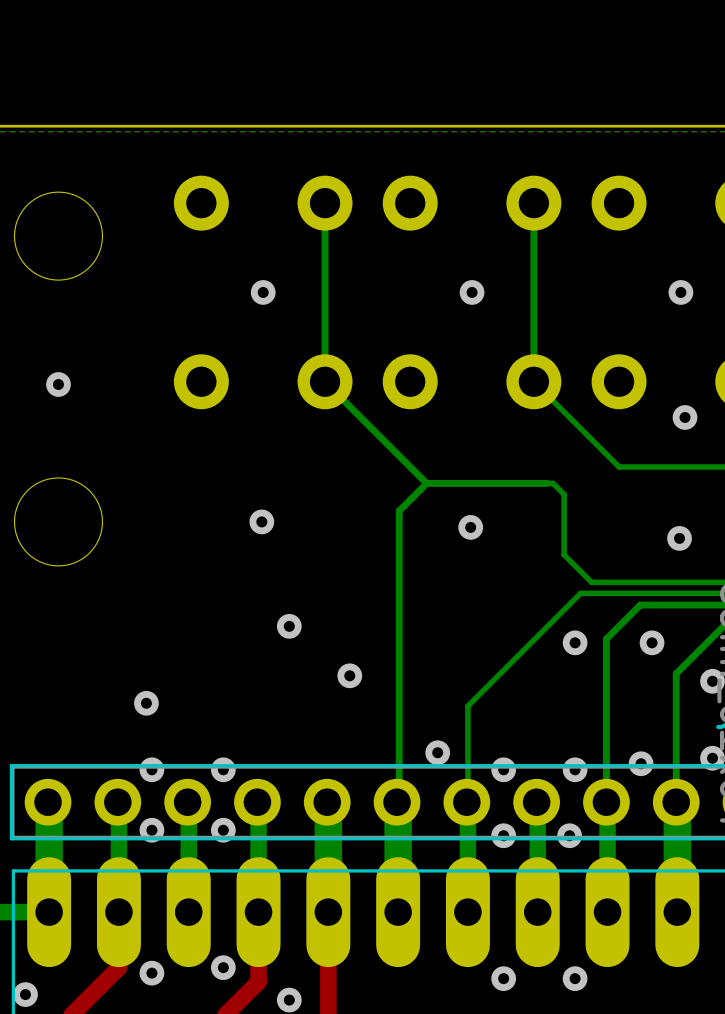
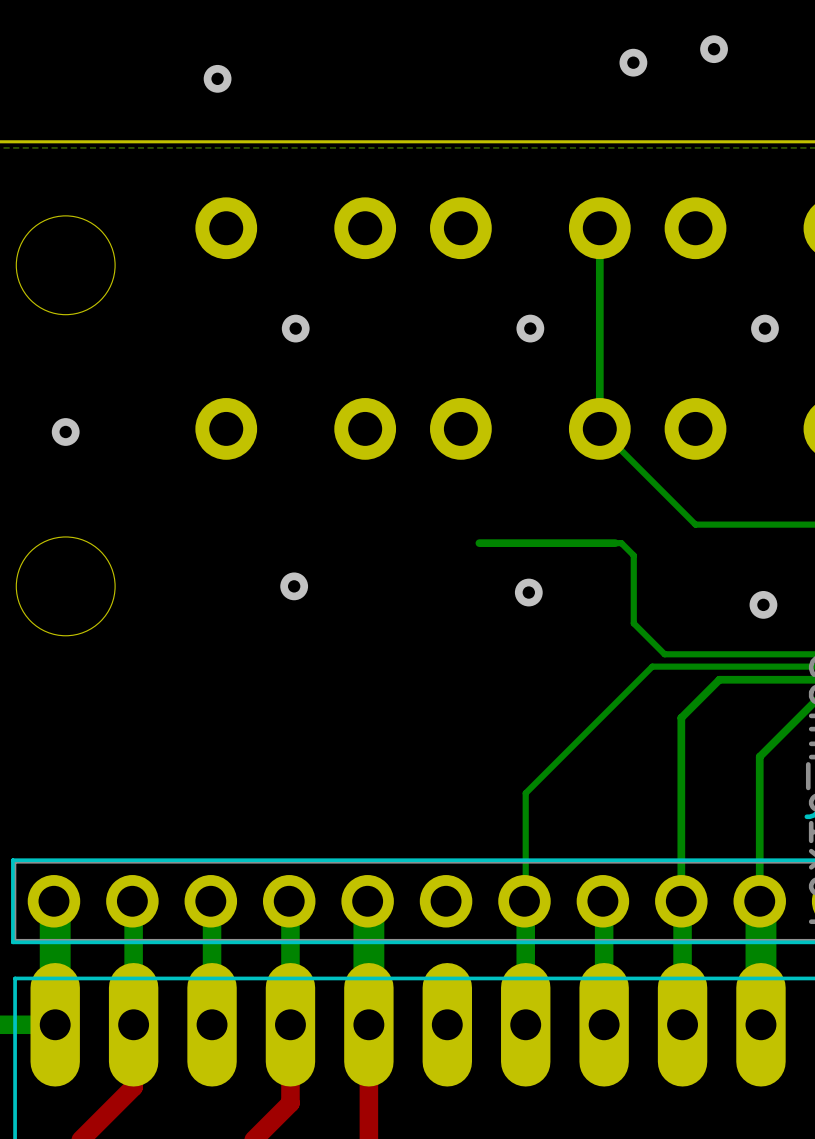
via: none -> (714, 49)
via: none -> (633, 62)
via: none -> (217, 78)
bottom track: (325, 203) (325, 381) (426, 483) (399, 510) (398, 912) -> none
via: (685, 417) -> none
via: (289, 626) -> none
via: (575, 642) -> none
via: (652, 642) -> none
via: (349, 675) -> none
via: (712, 681) -> none
via: (146, 703) -> none
via: (437, 752) -> none
via: (712, 758) -> none
via: (641, 763) -> none
via: (151, 769) -> none
via: (223, 769) -> none
via: (503, 769) -> none
via: (575, 769) -> none
via: (151, 830) -> none
via: (223, 830) -> none
via: (503, 835) -> none
via: (569, 835) -> none
via: (223, 967) -> none
via: (151, 973) -> none
via: (503, 978) -> none
via: (575, 978) -> none
via: (25, 994) -> none
via: (289, 1000) -> none

